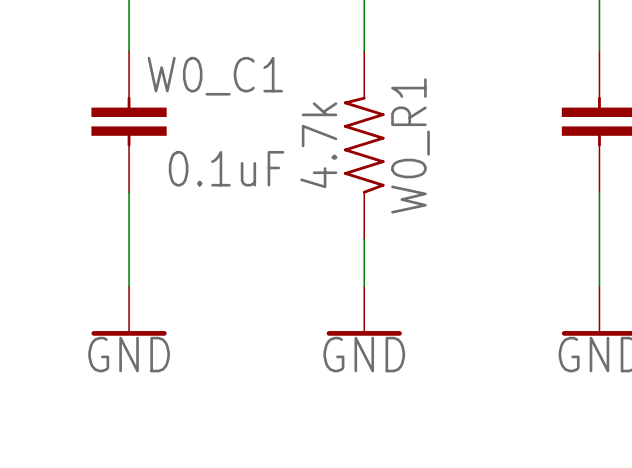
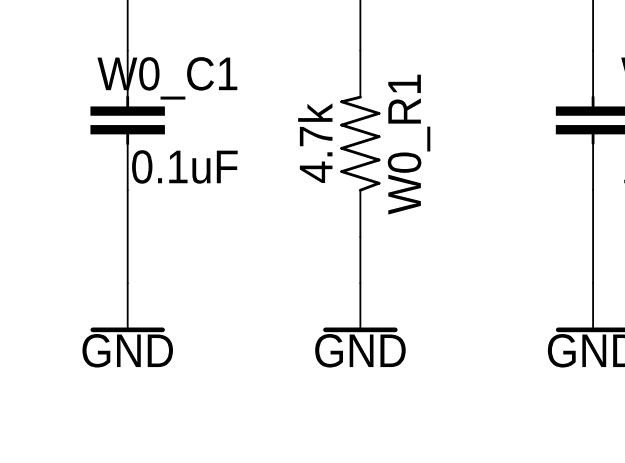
W0_C1 name position: W0_C1 (215, 76) -> W0_C1 (167, 78)
W0_C1 value position: 0.1uF (226, 168) -> 0.1uF (184, 166)

